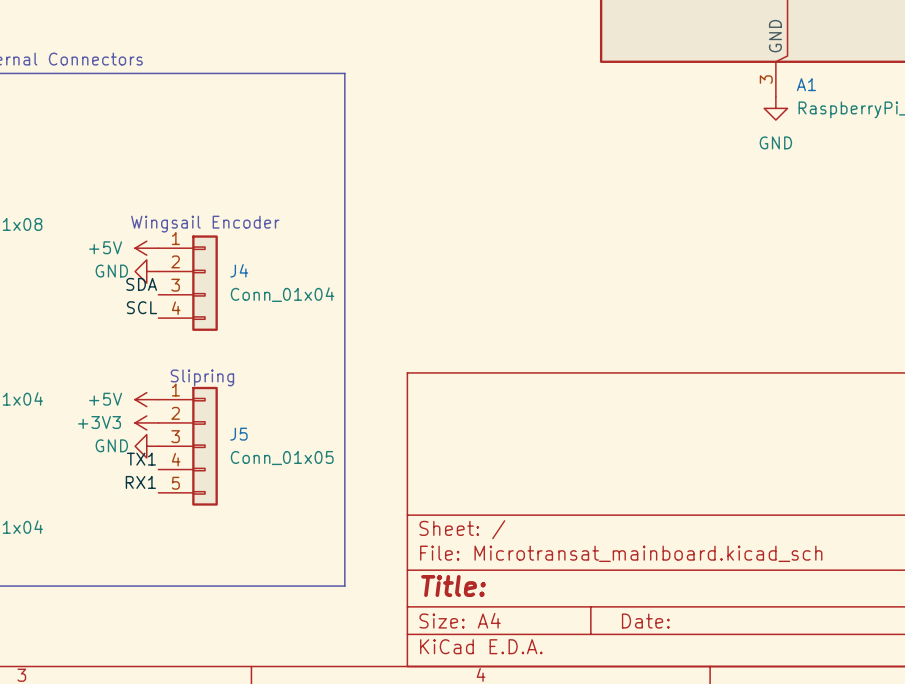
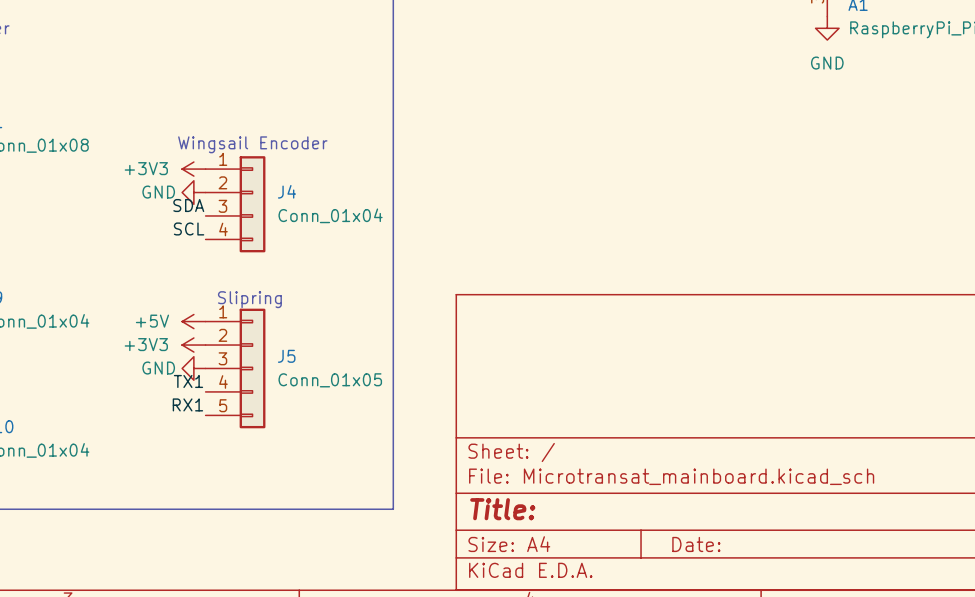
power symbol: +5V (146, 248) -> +3V3 (193, 169)

